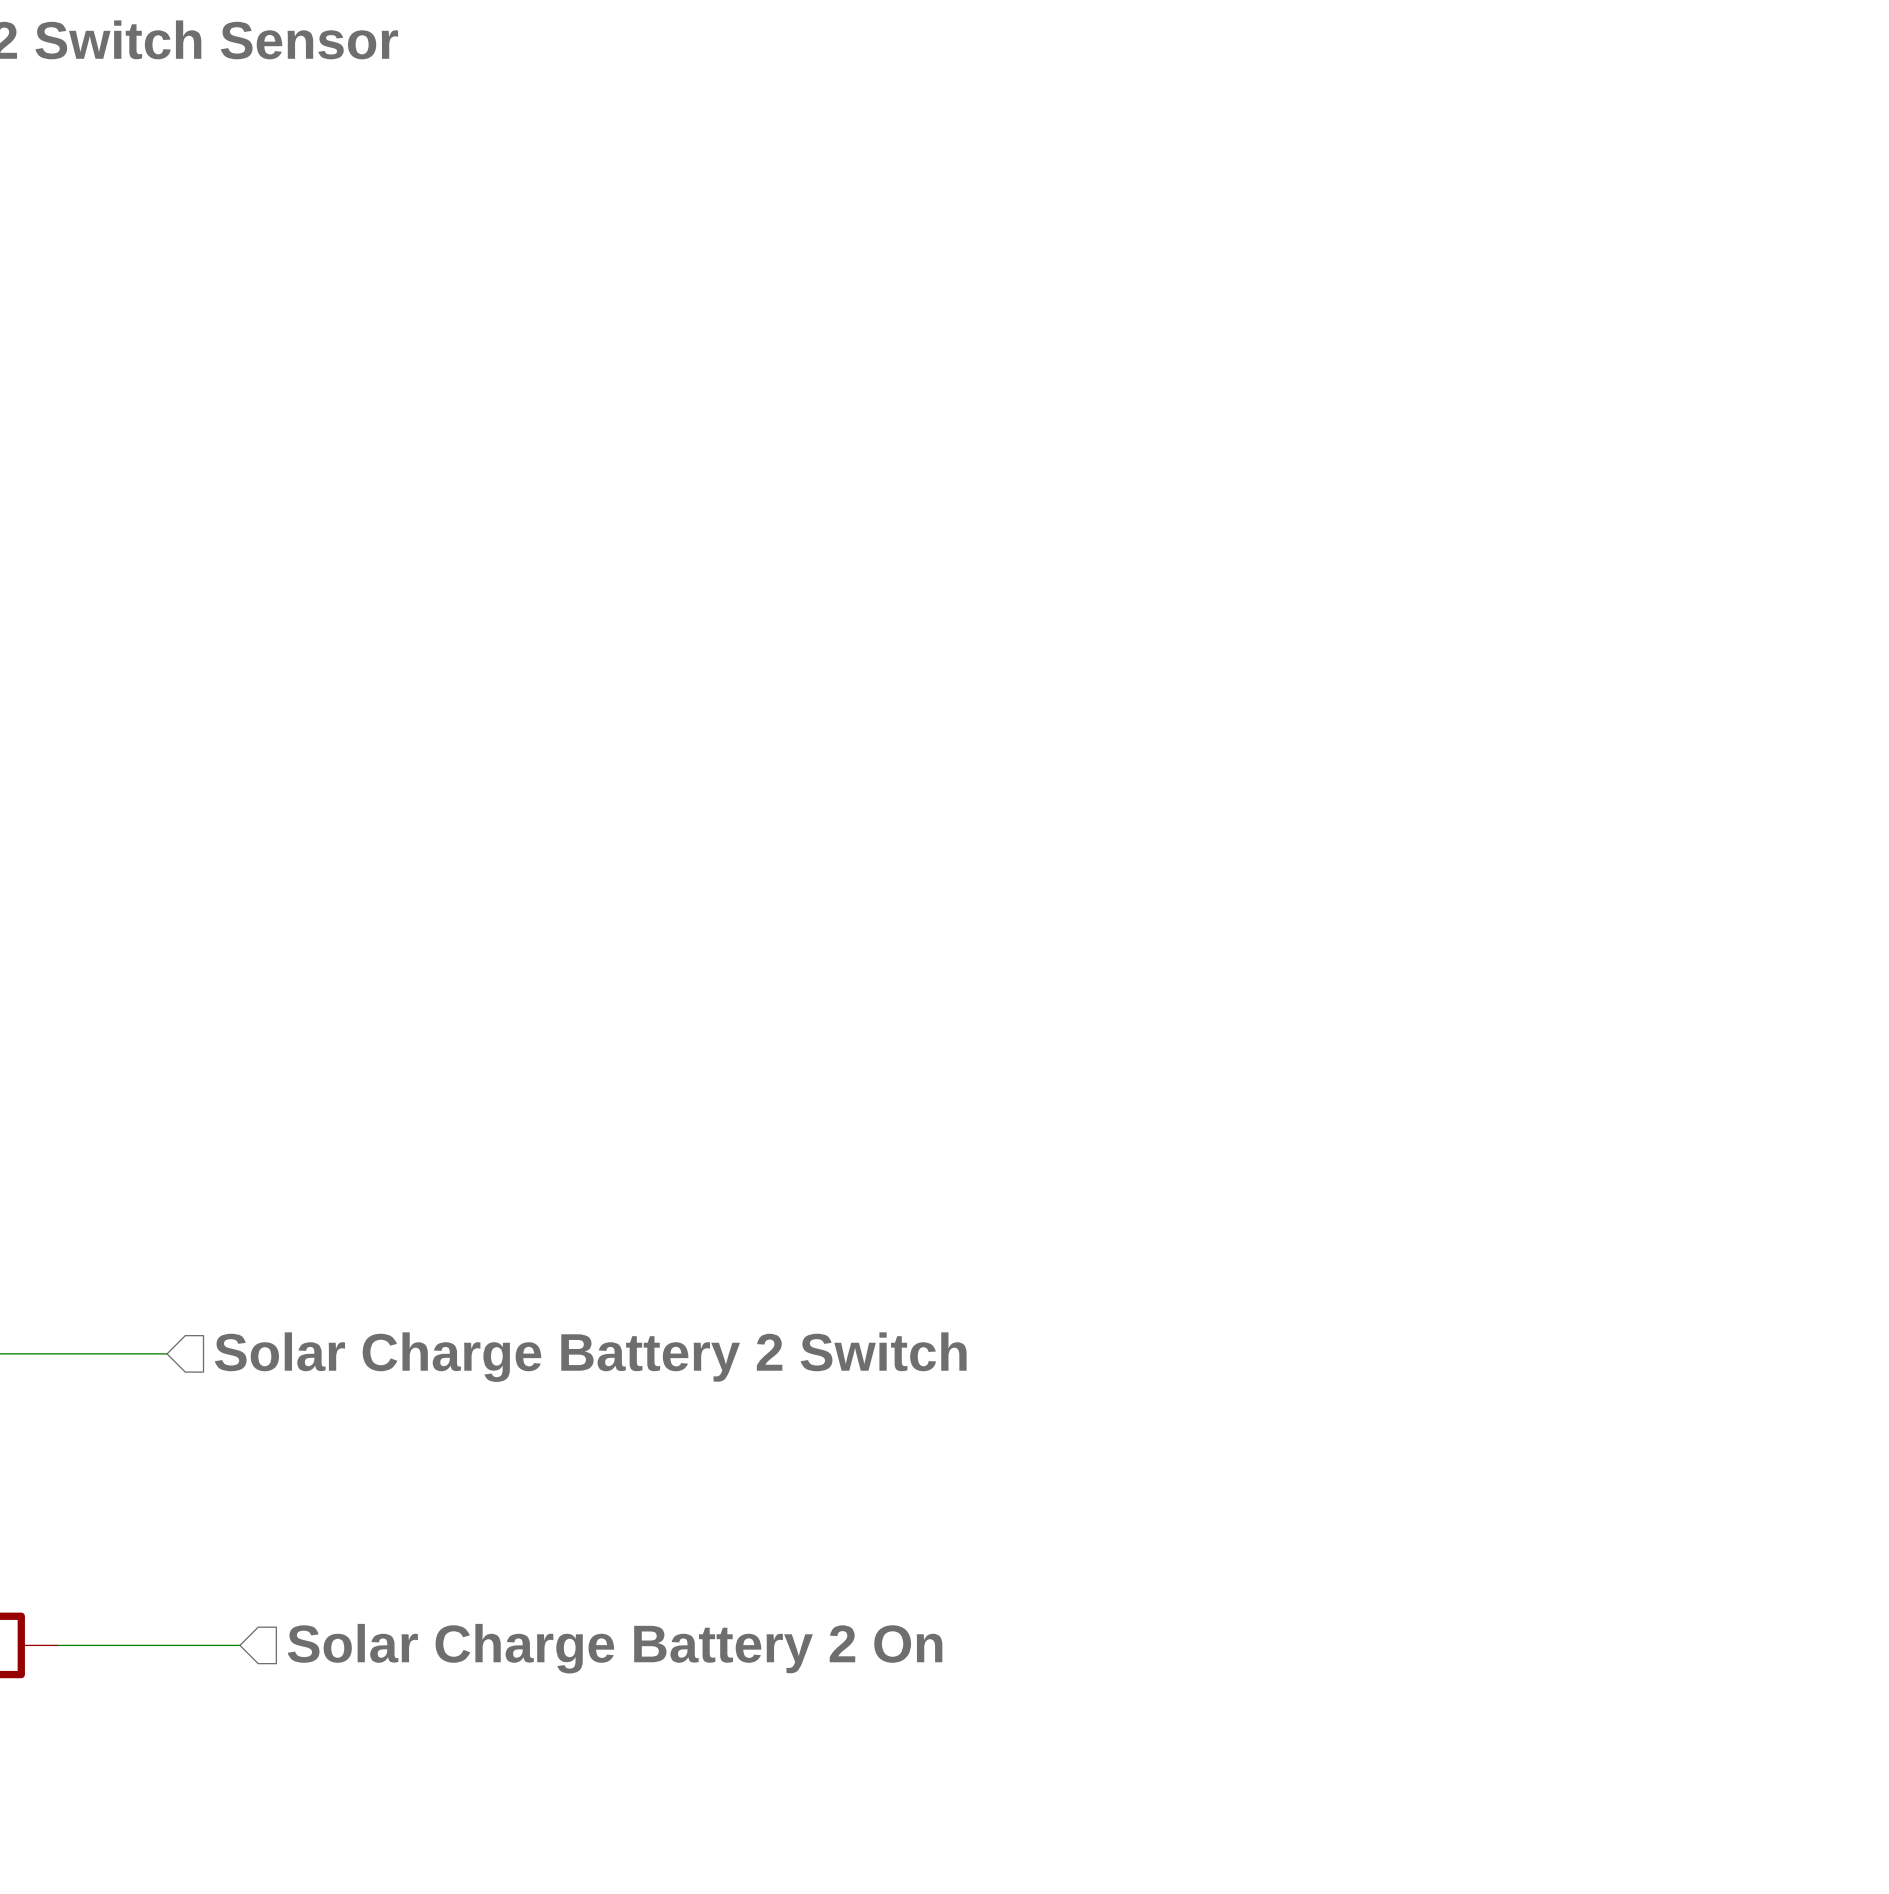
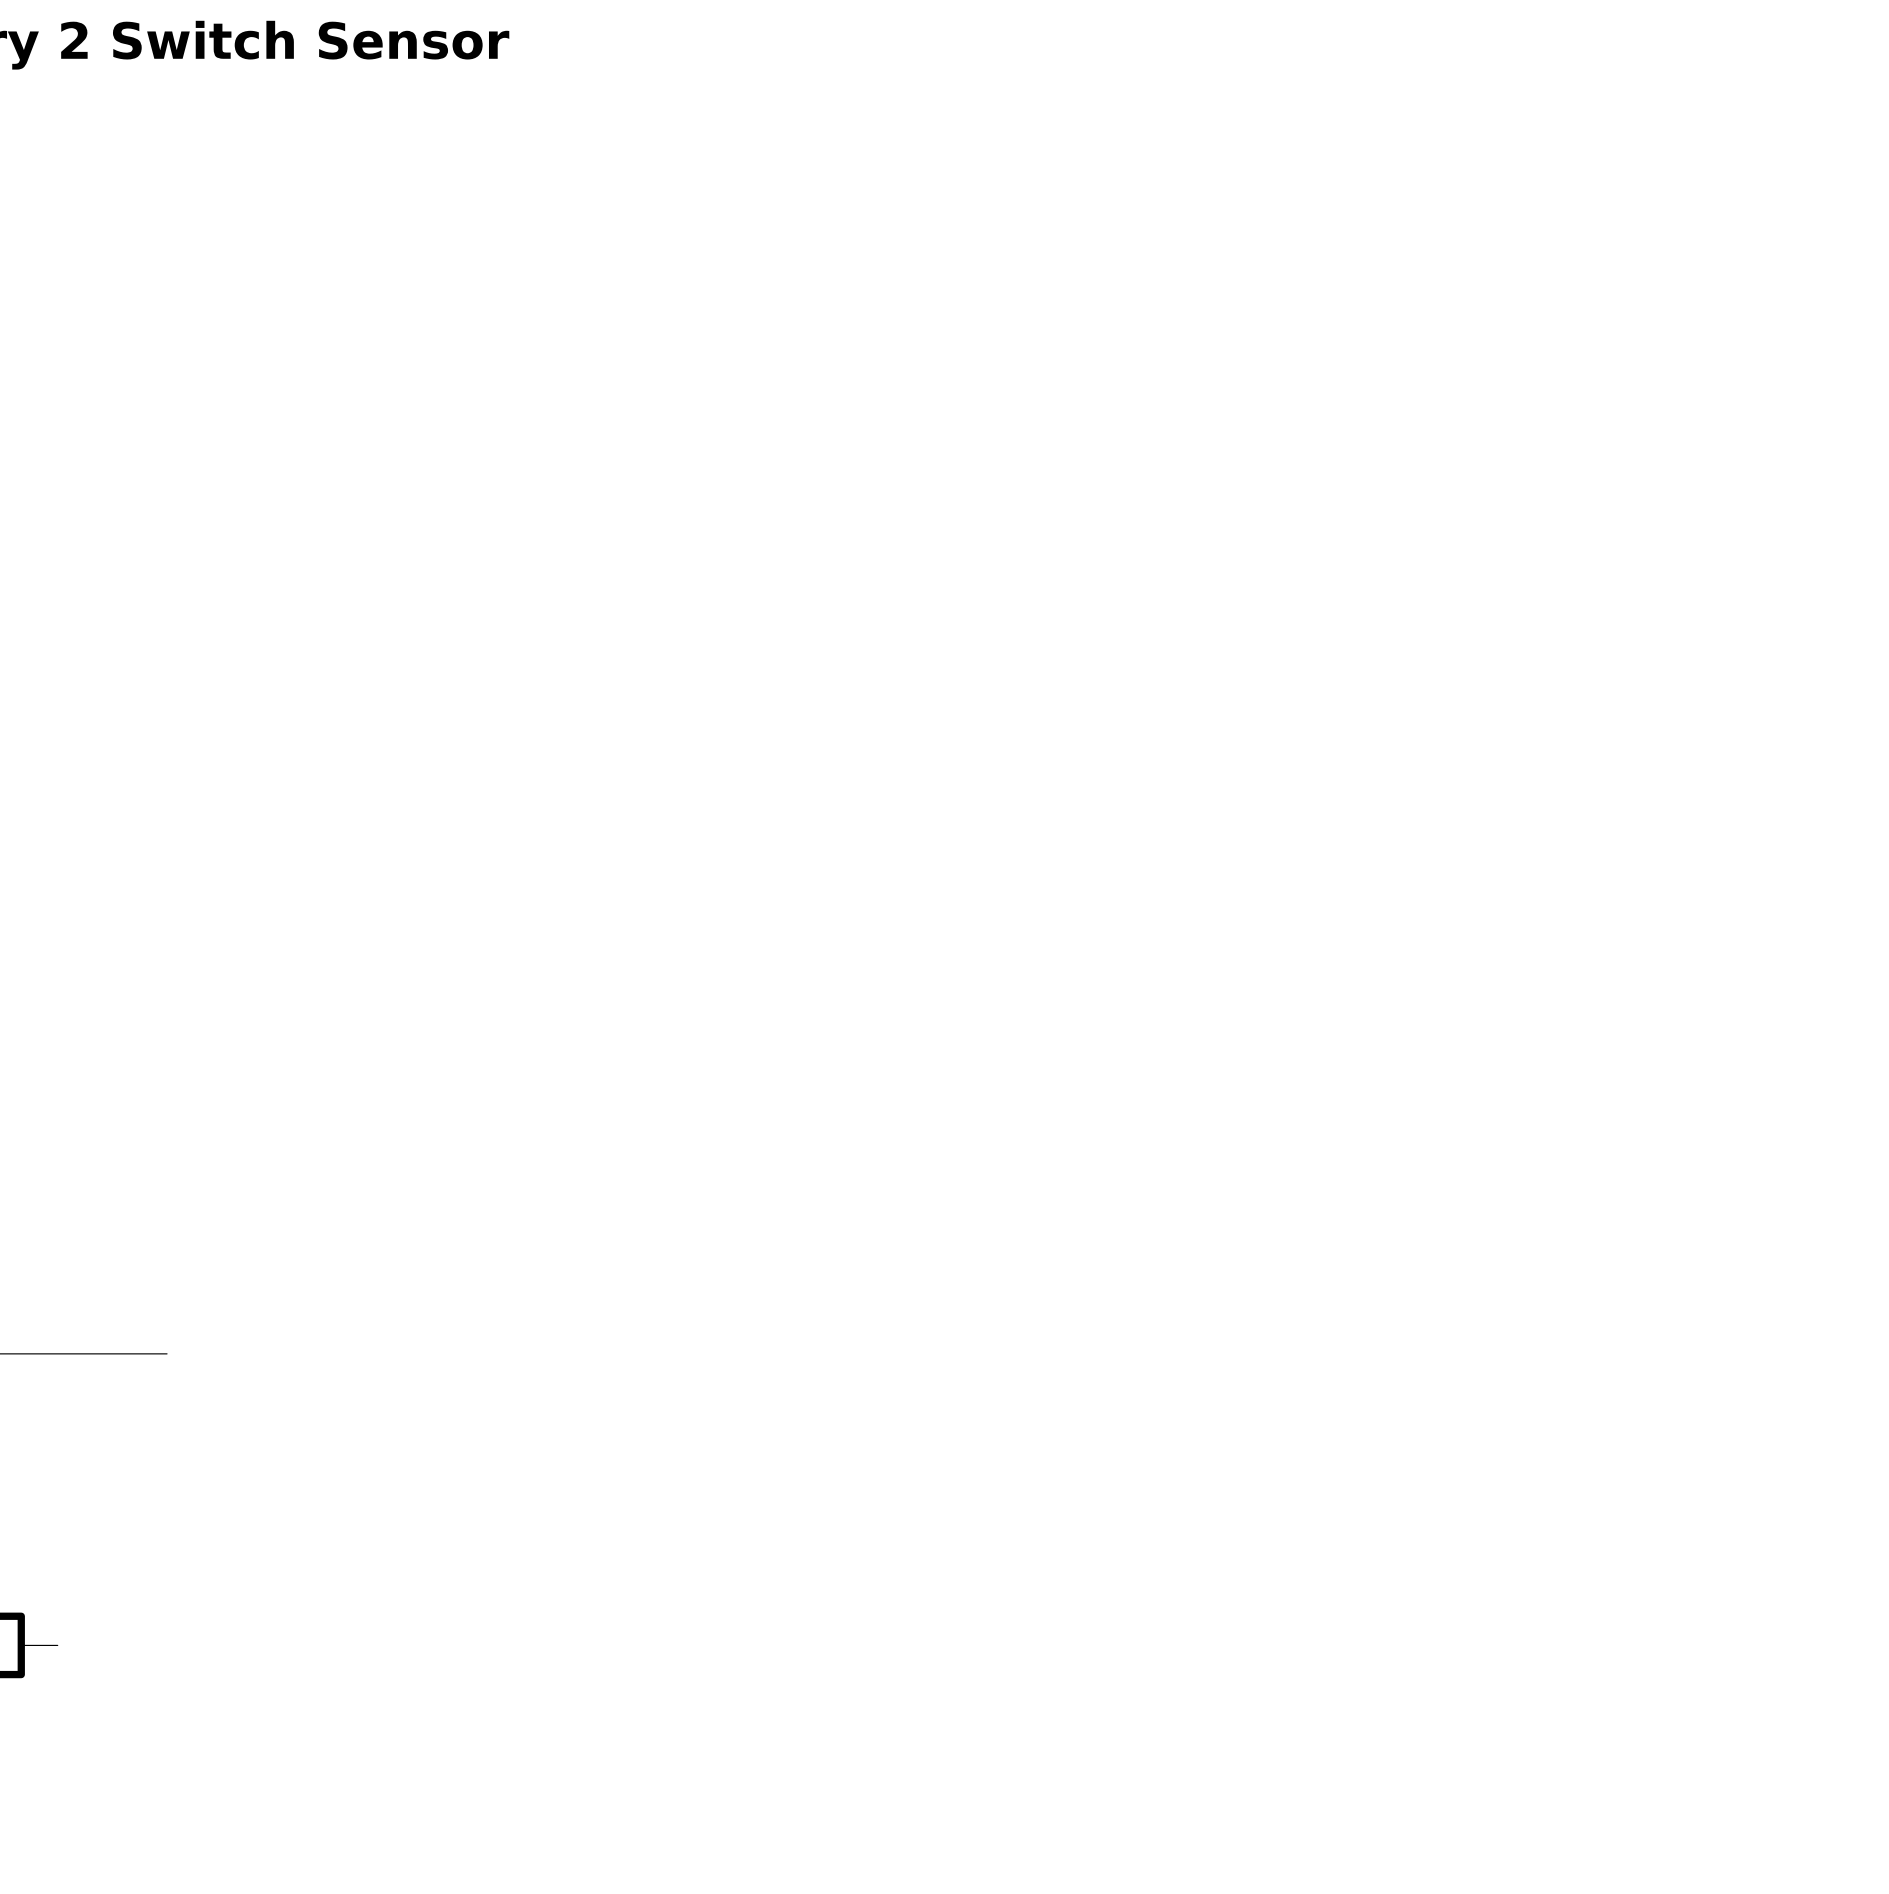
hierarchical label: Solar Charge Battery 2 Switch (590, 1357) -> none
wire: (57, 1645) (239, 1645) -> none
hierarchical label: Solar Charge Battery 2 On (615, 1648) -> none

